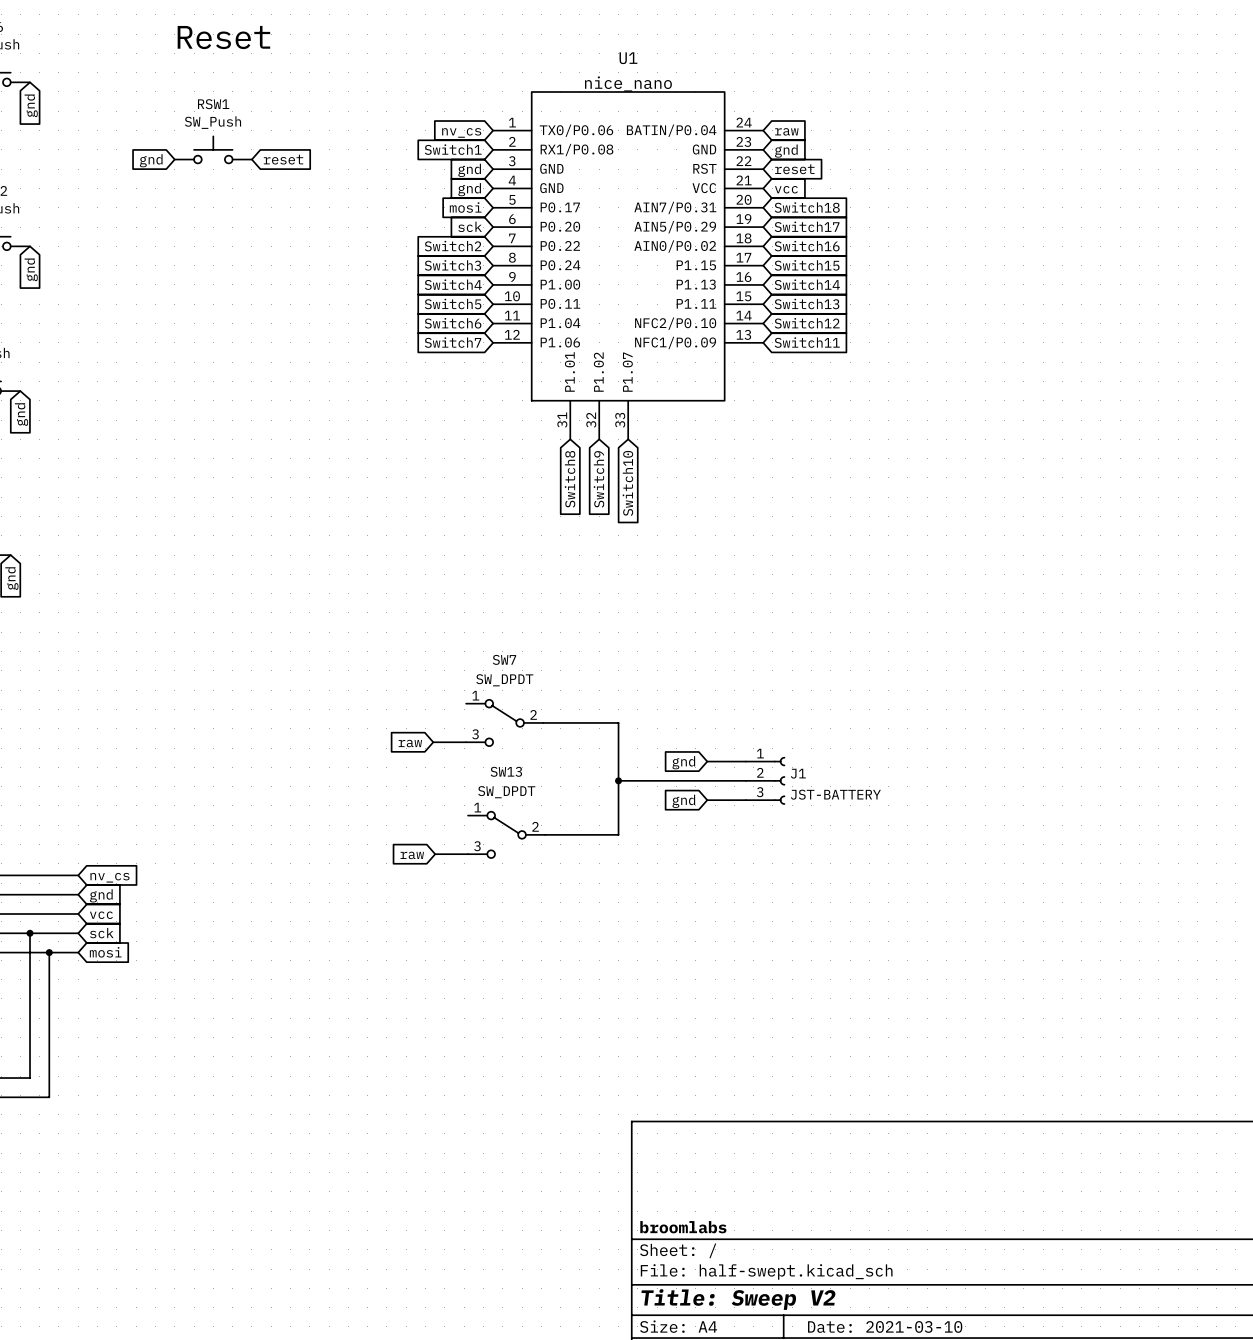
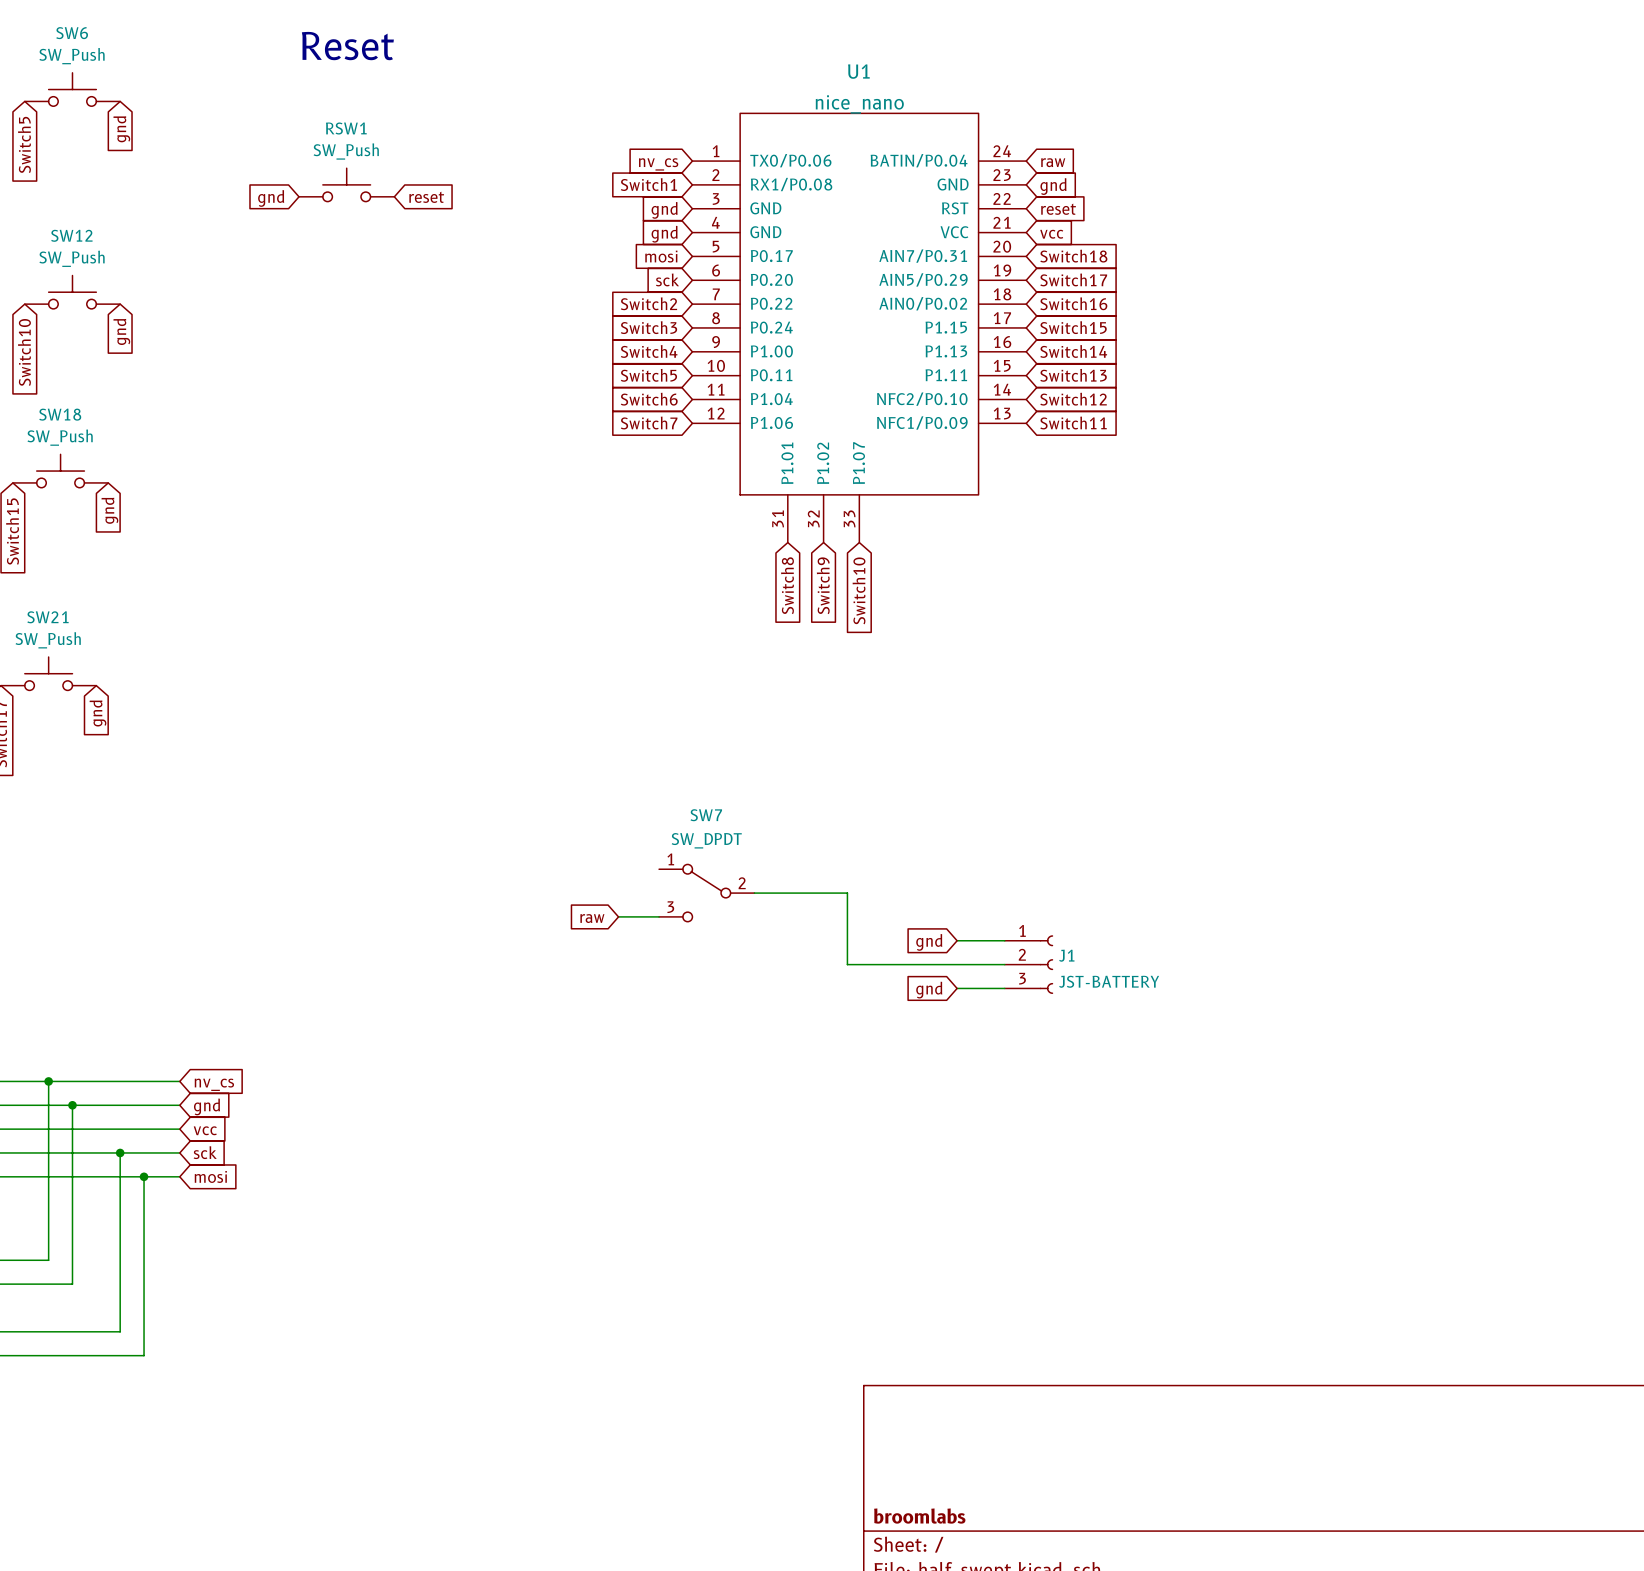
wire: (618, 780) (618, 834) (545, 834) -> none
junction: (618, 780) -> none
SW13: SW_DPDT (506, 834) -> none
wire: (435, 854) (468, 854) -> none
global label: raw (412, 855) -> none

